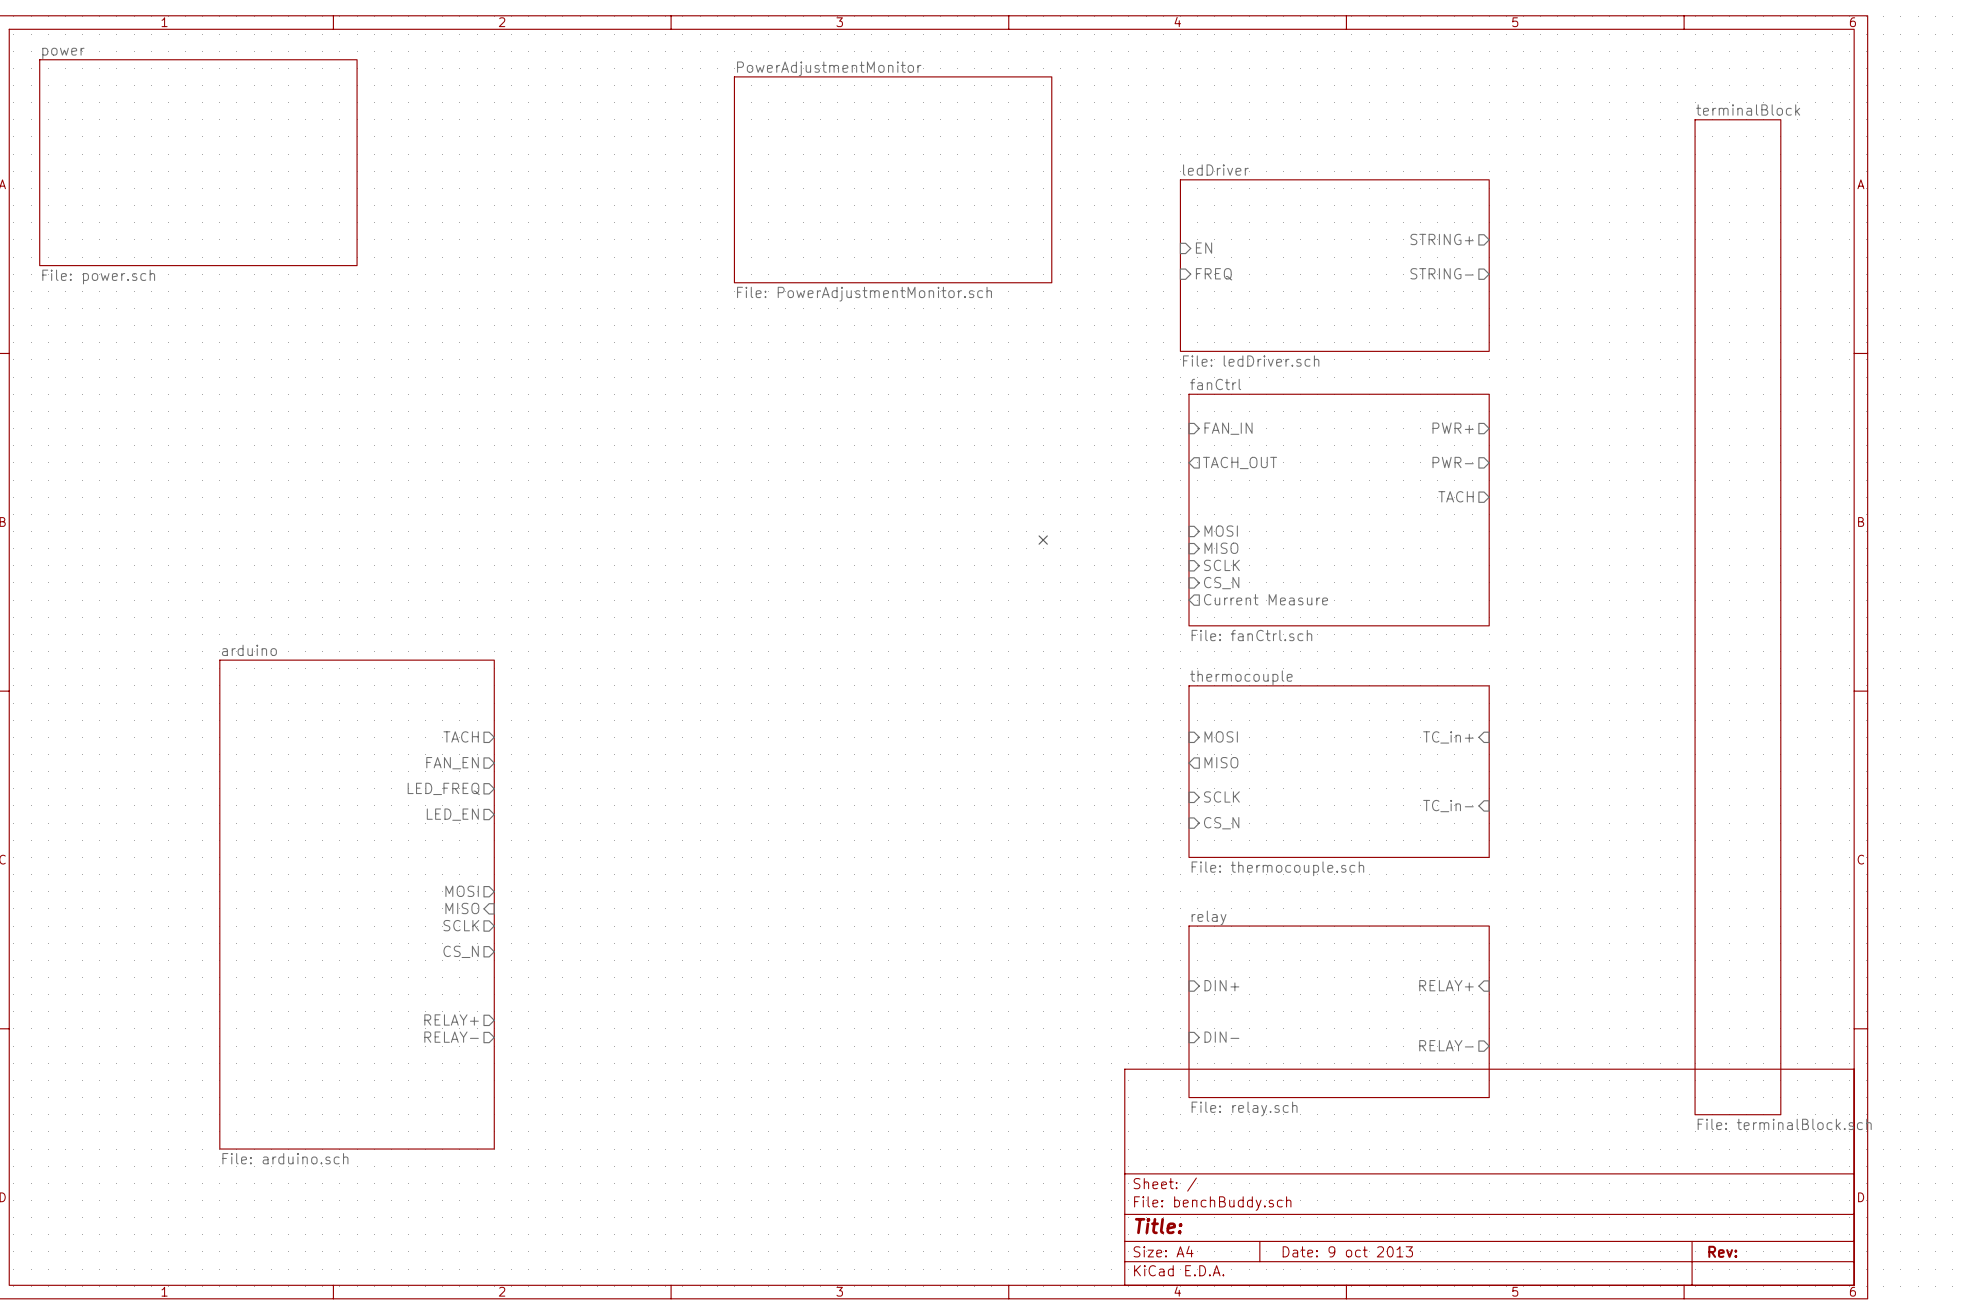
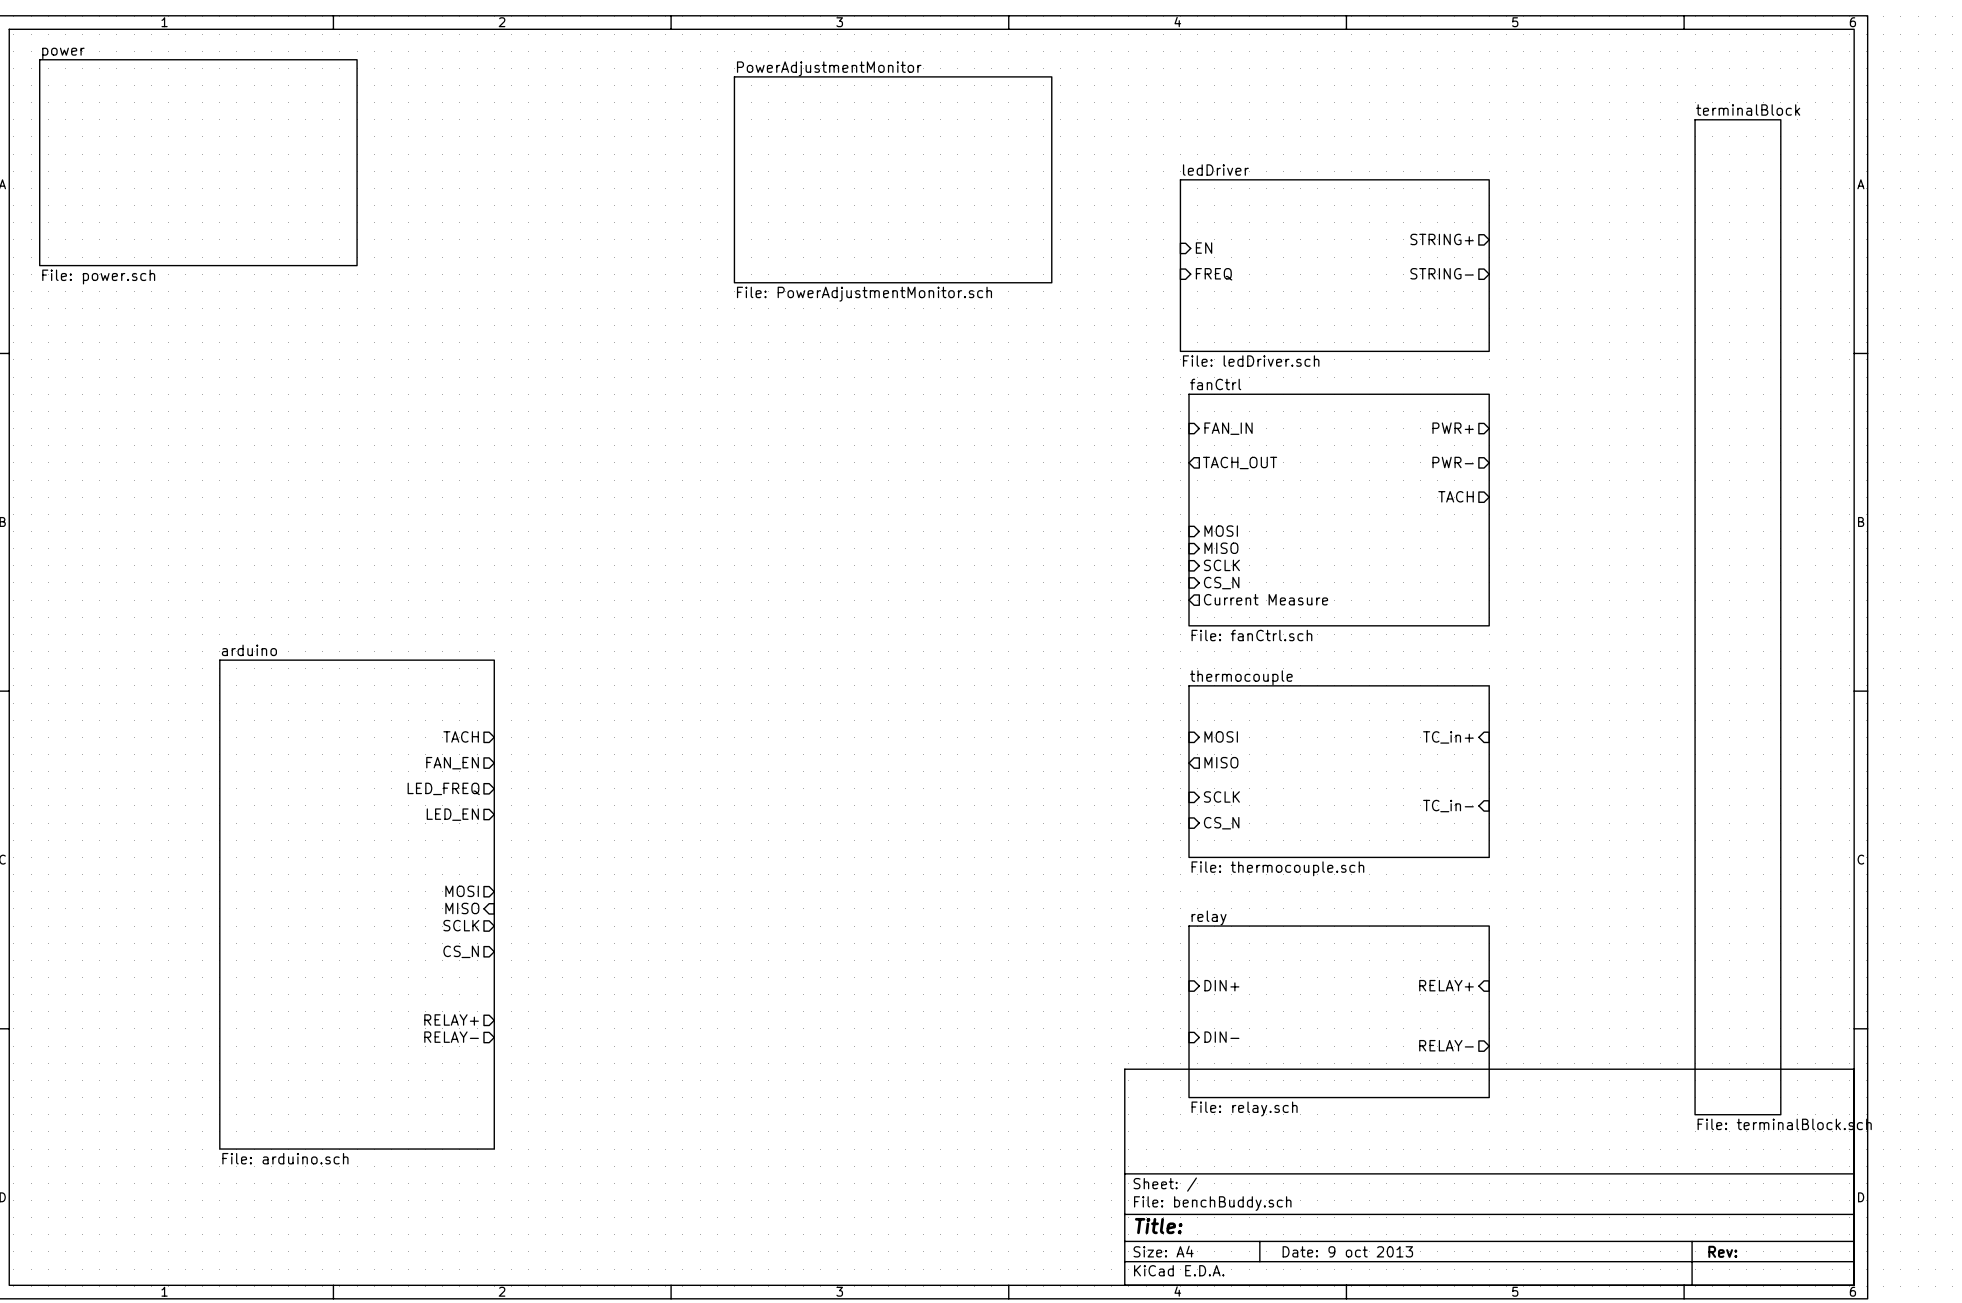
no-connect mark: (1043, 540) -> none

